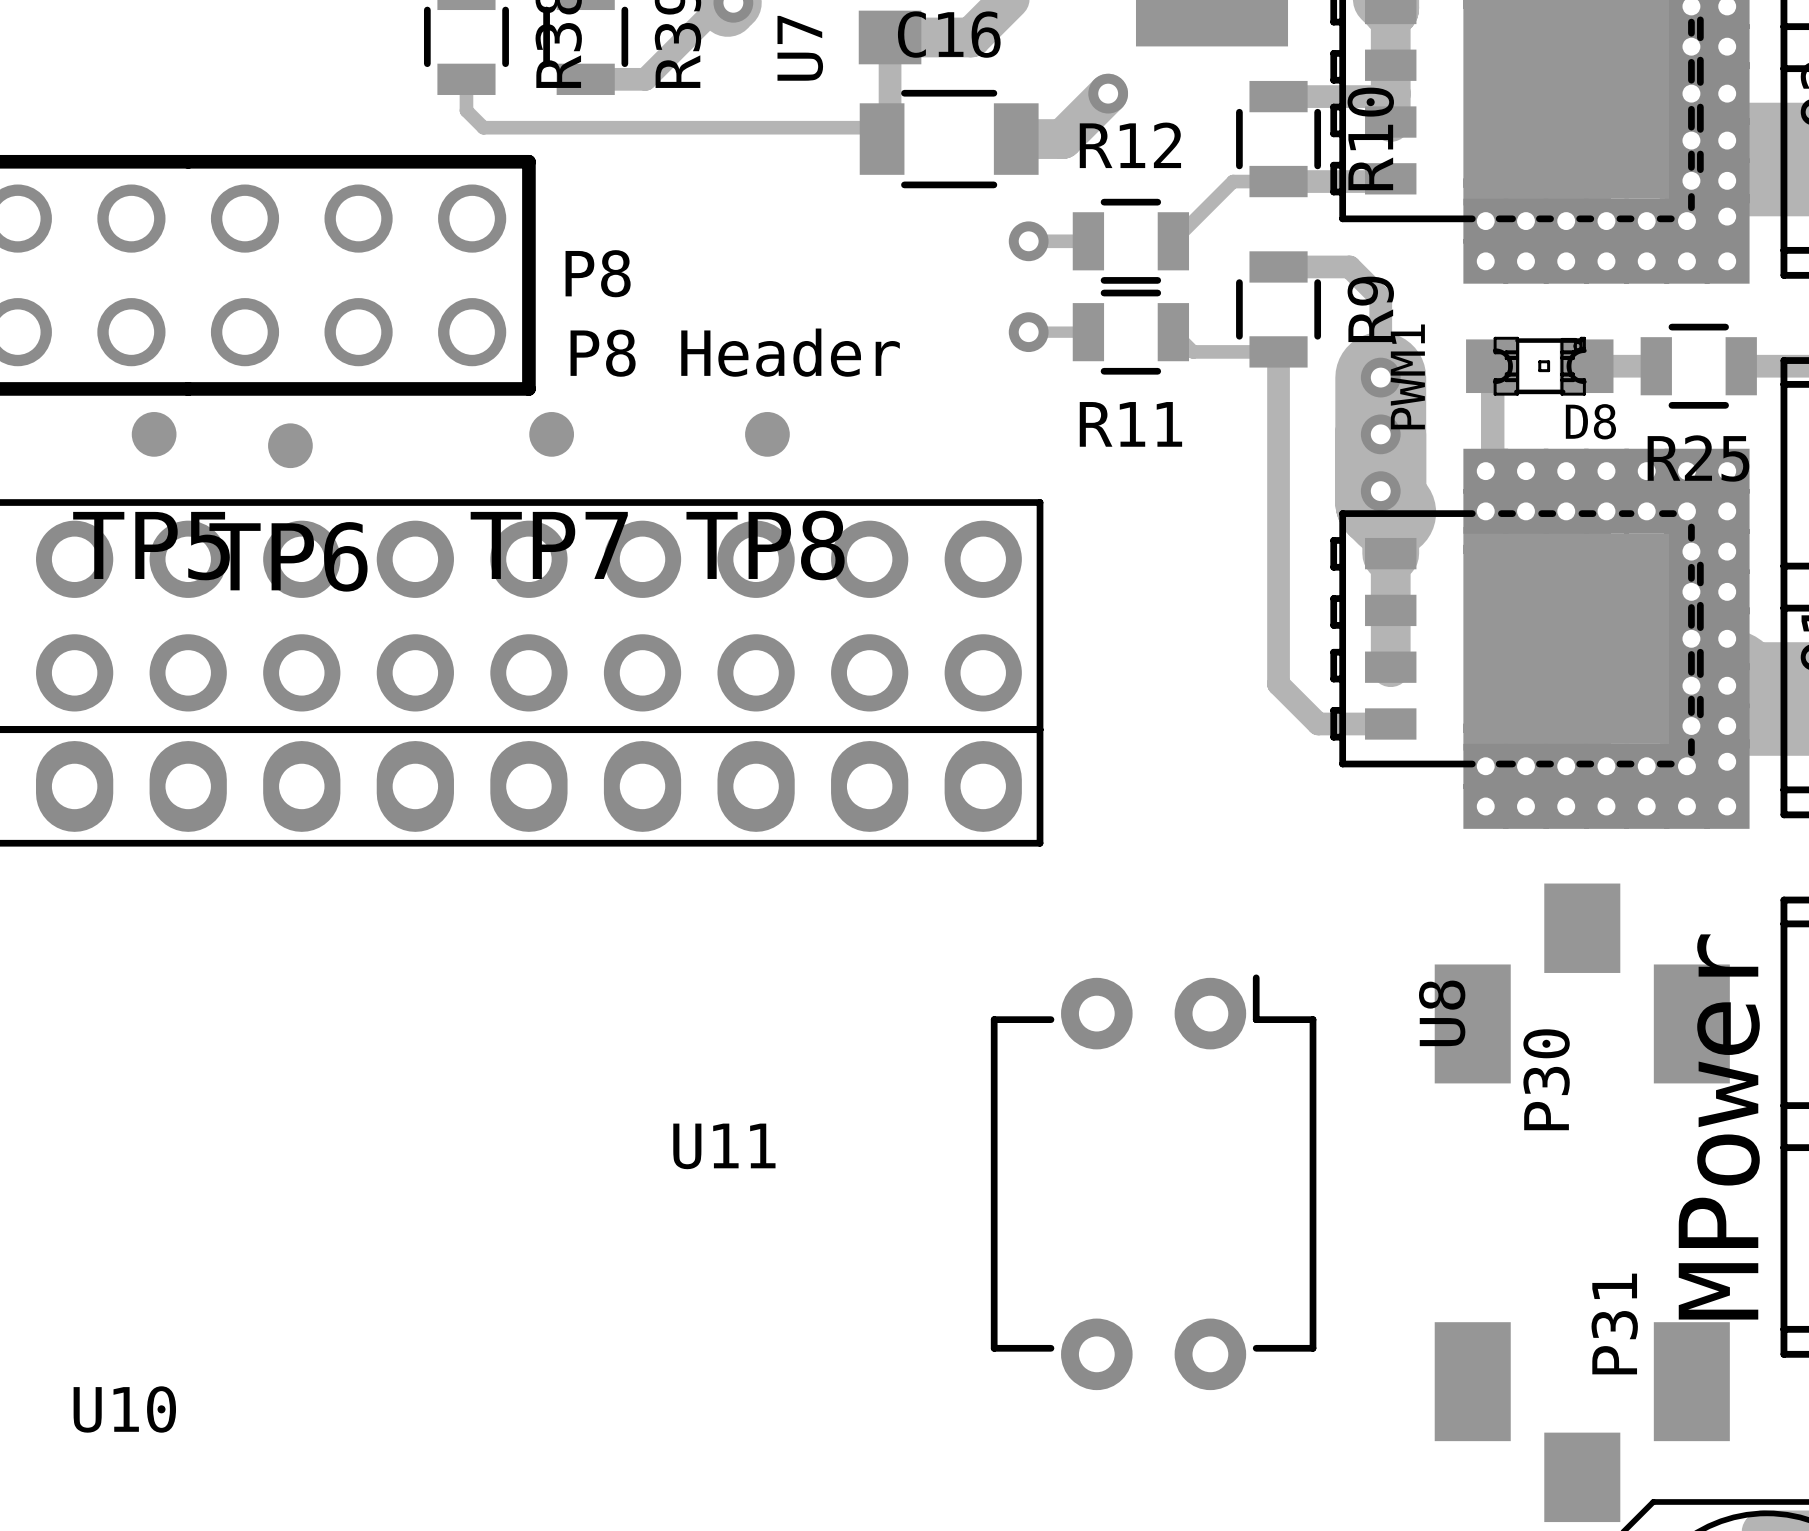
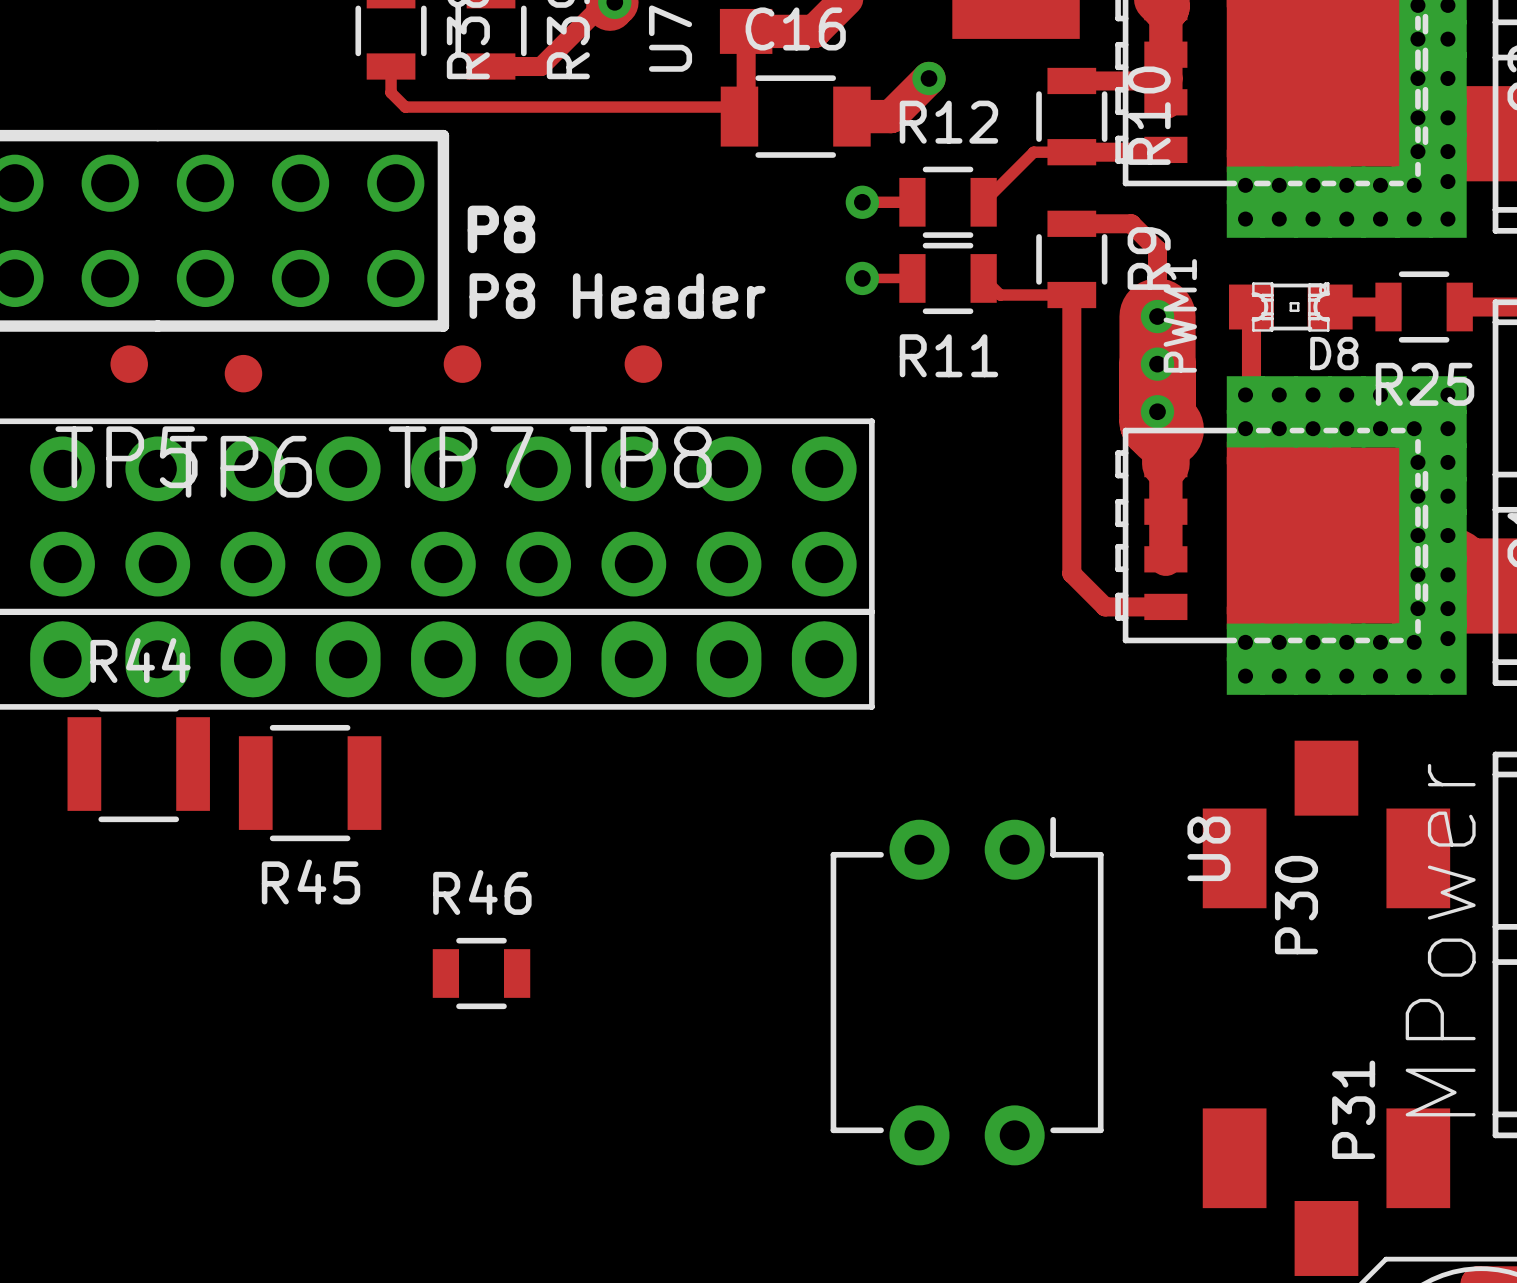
R44: none -> (138, 764)
R45: none -> (310, 783)
U11: (724, 1146) -> none
R46: none -> (481, 973)
U10: (124, 1409) -> none

